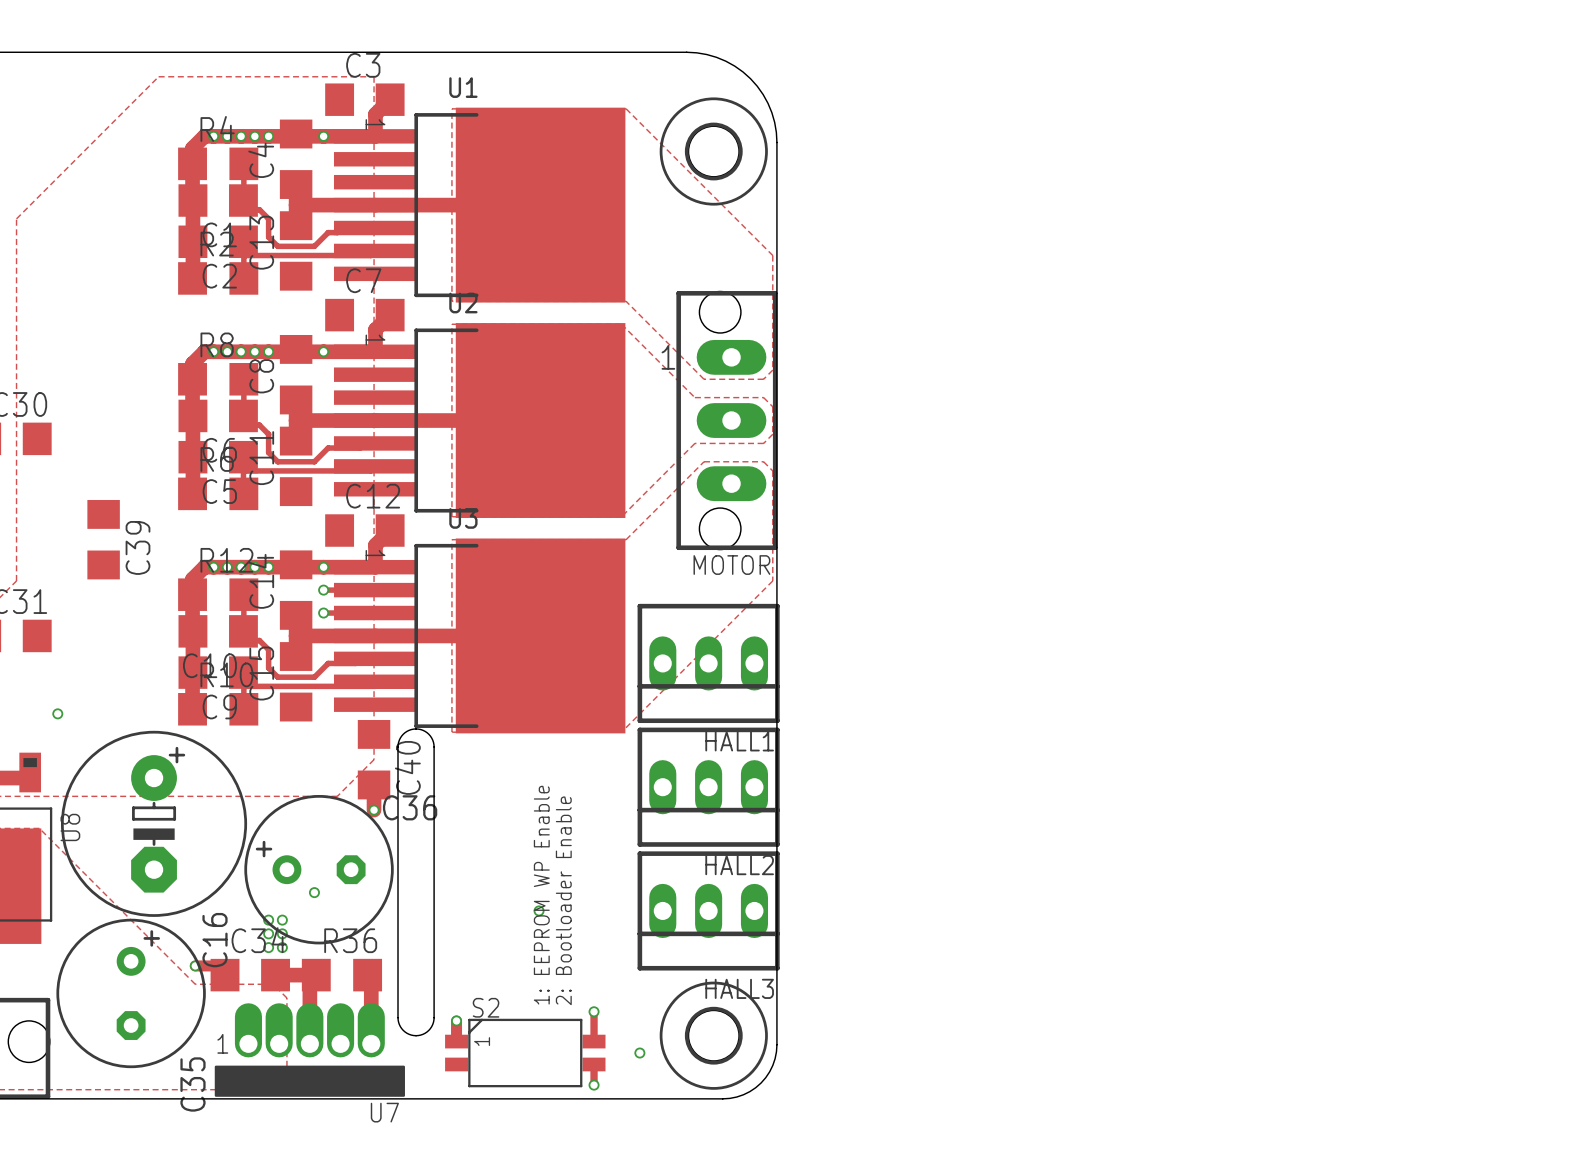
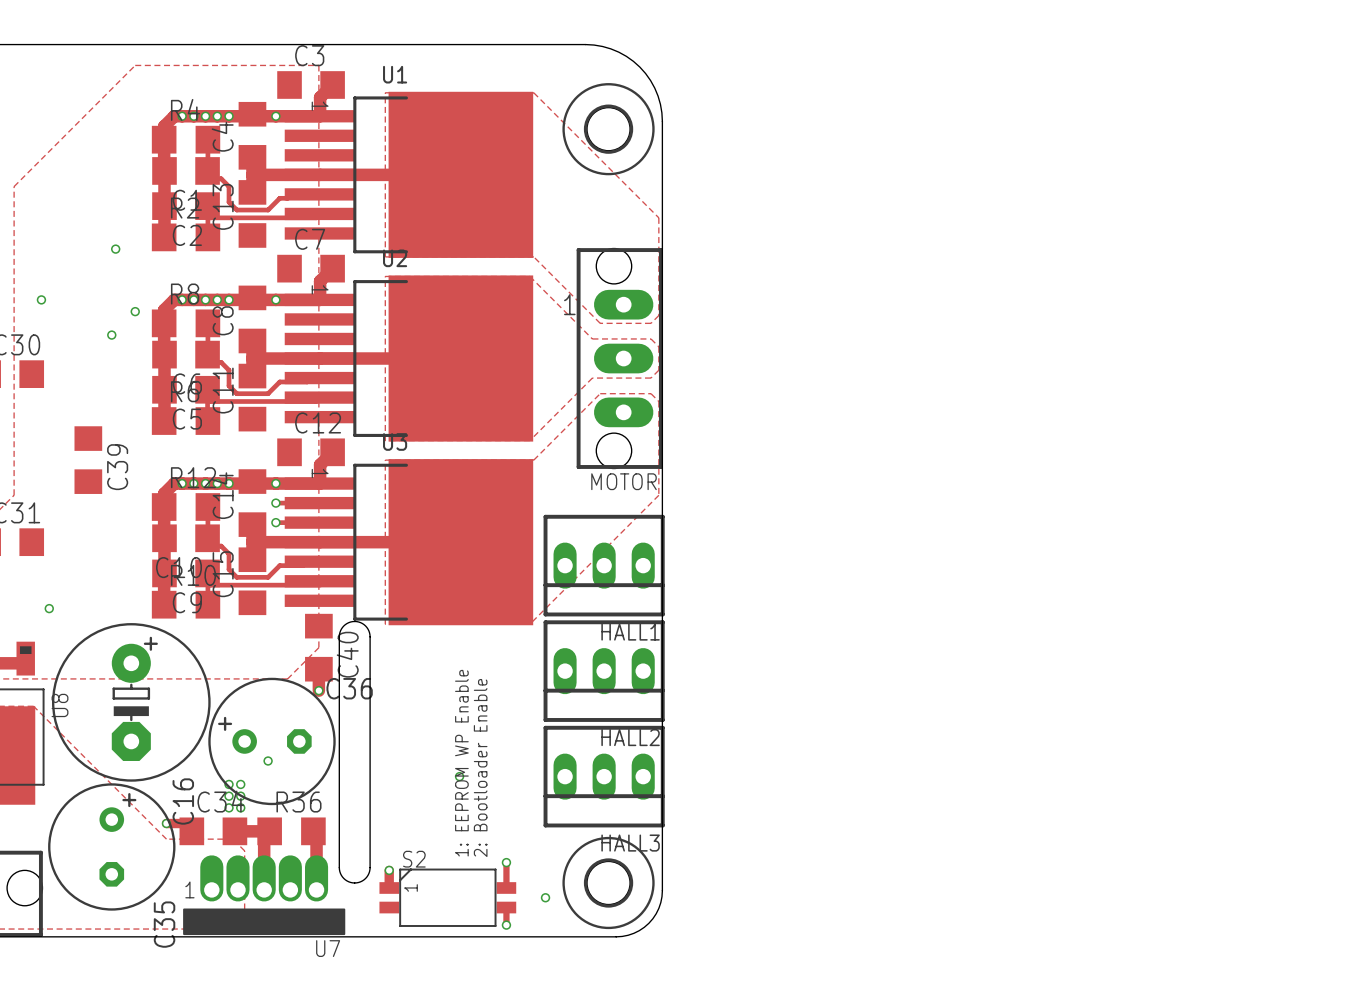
via: none -> (115, 249)
via: none -> (41, 299)
via: none -> (135, 311)
via: none -> (111, 335)

